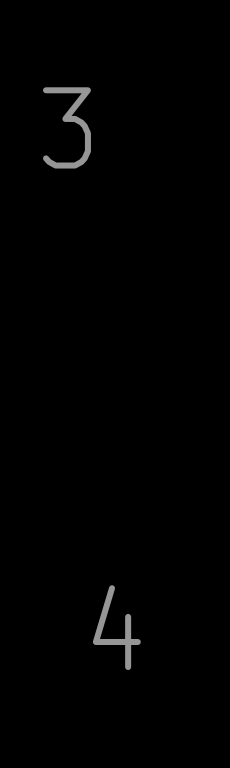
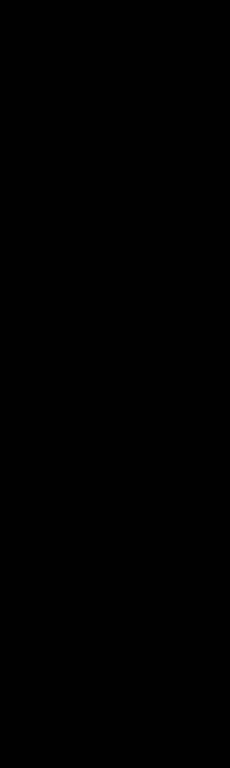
text: 3 (66, 127) -> none
text: 4 (116, 627) -> none

